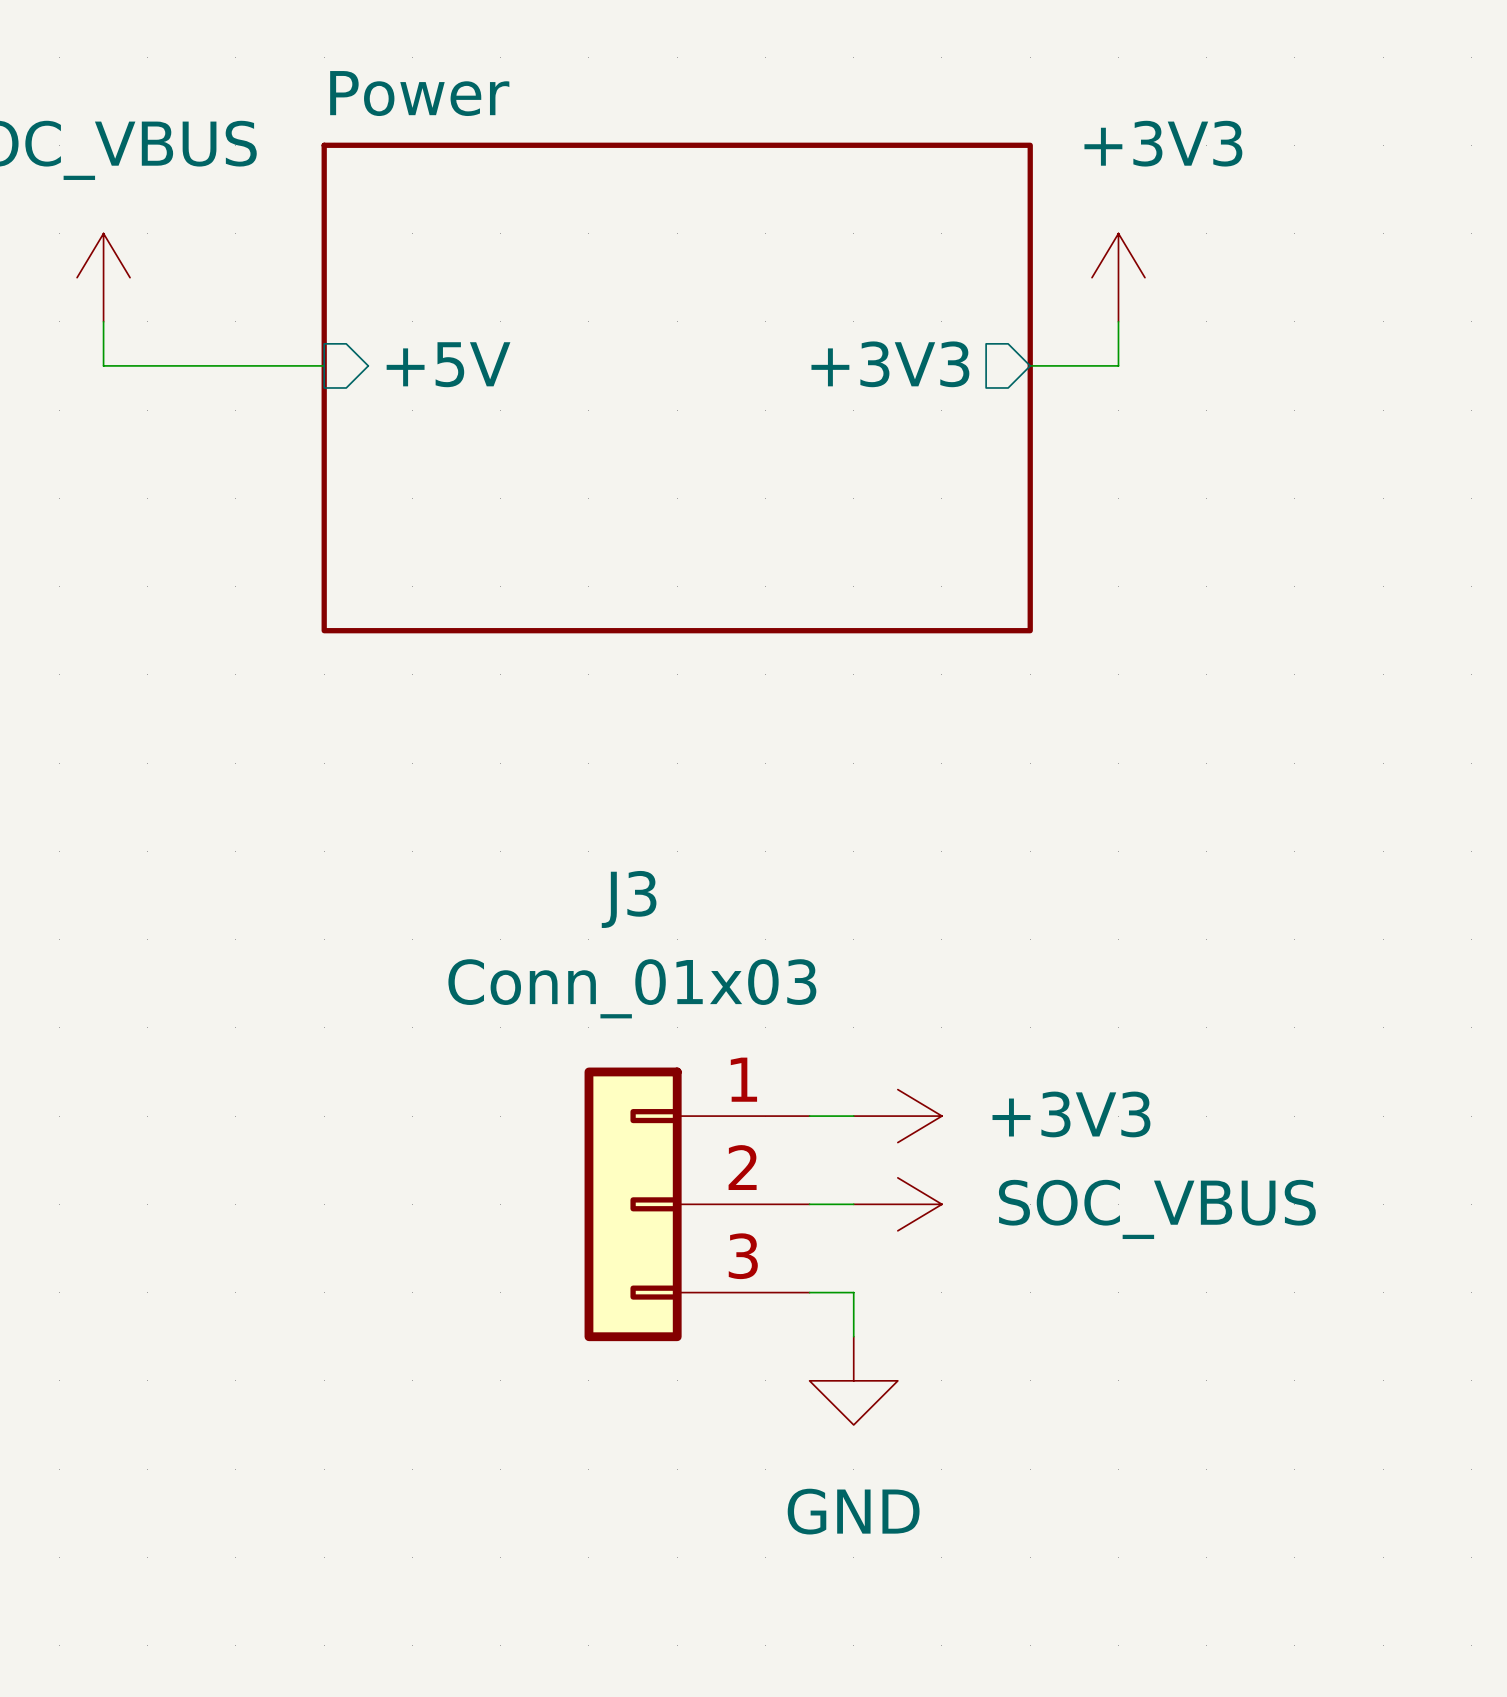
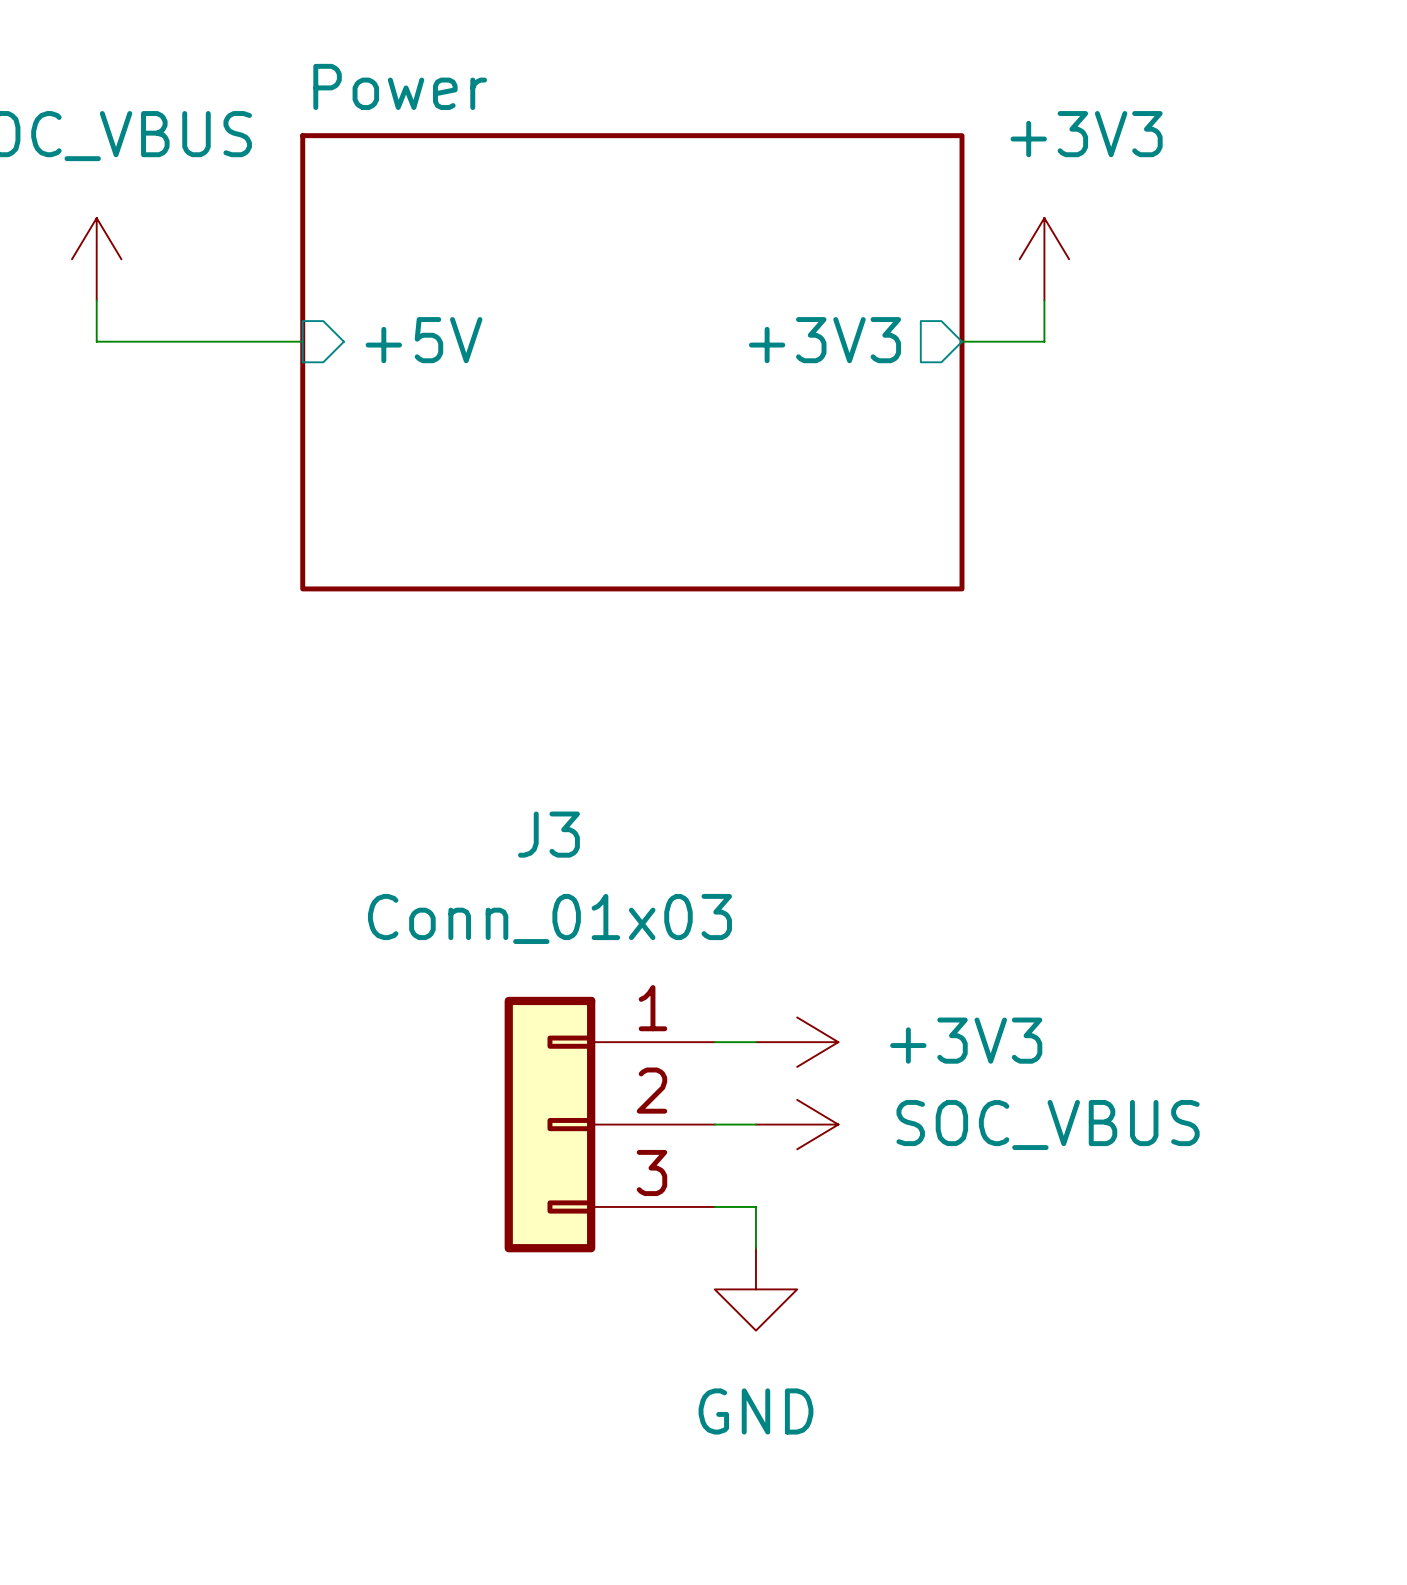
power symbol position: +3V3 (897, 1116) -> +3V3 (797, 1042)
J3 position: (697, 1204) -> (609, 1124)
power symbol position: SOC_VBUS (897, 1204) -> SOC_VBUS (797, 1124)
wire: (809, 1292) (853, 1292) (853, 1336) -> (714, 1206) (755, 1206) (755, 1248)
power symbol position: GND (853, 1380) -> GND (755, 1289)

